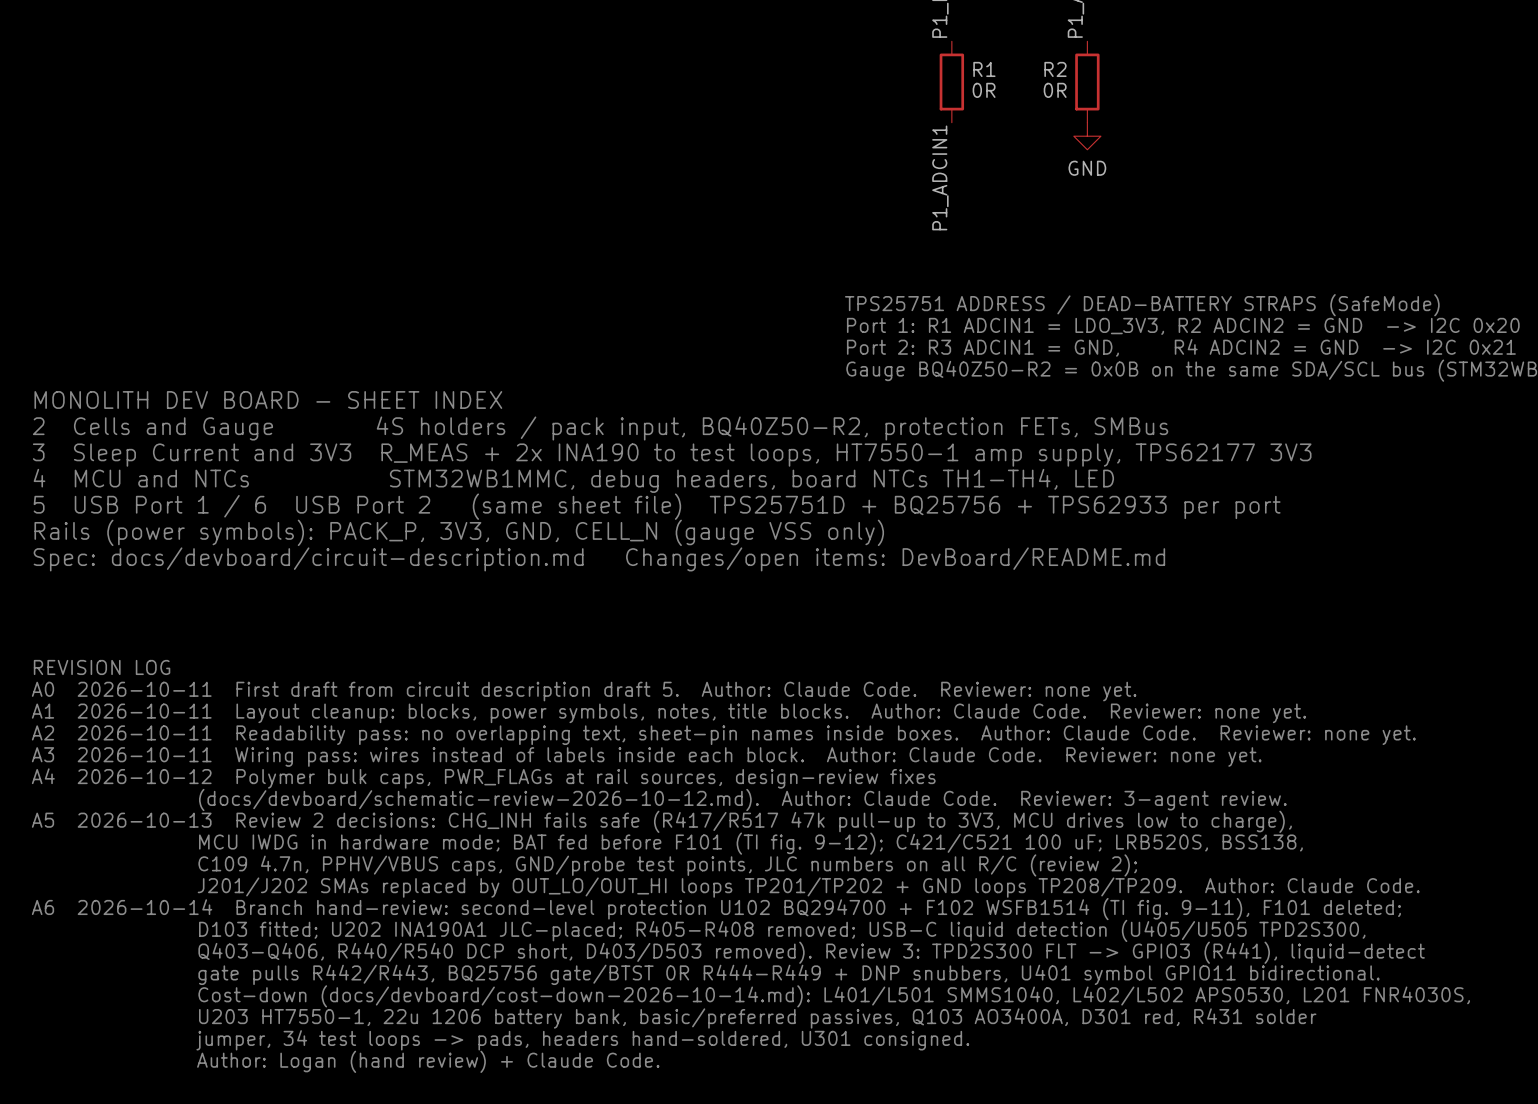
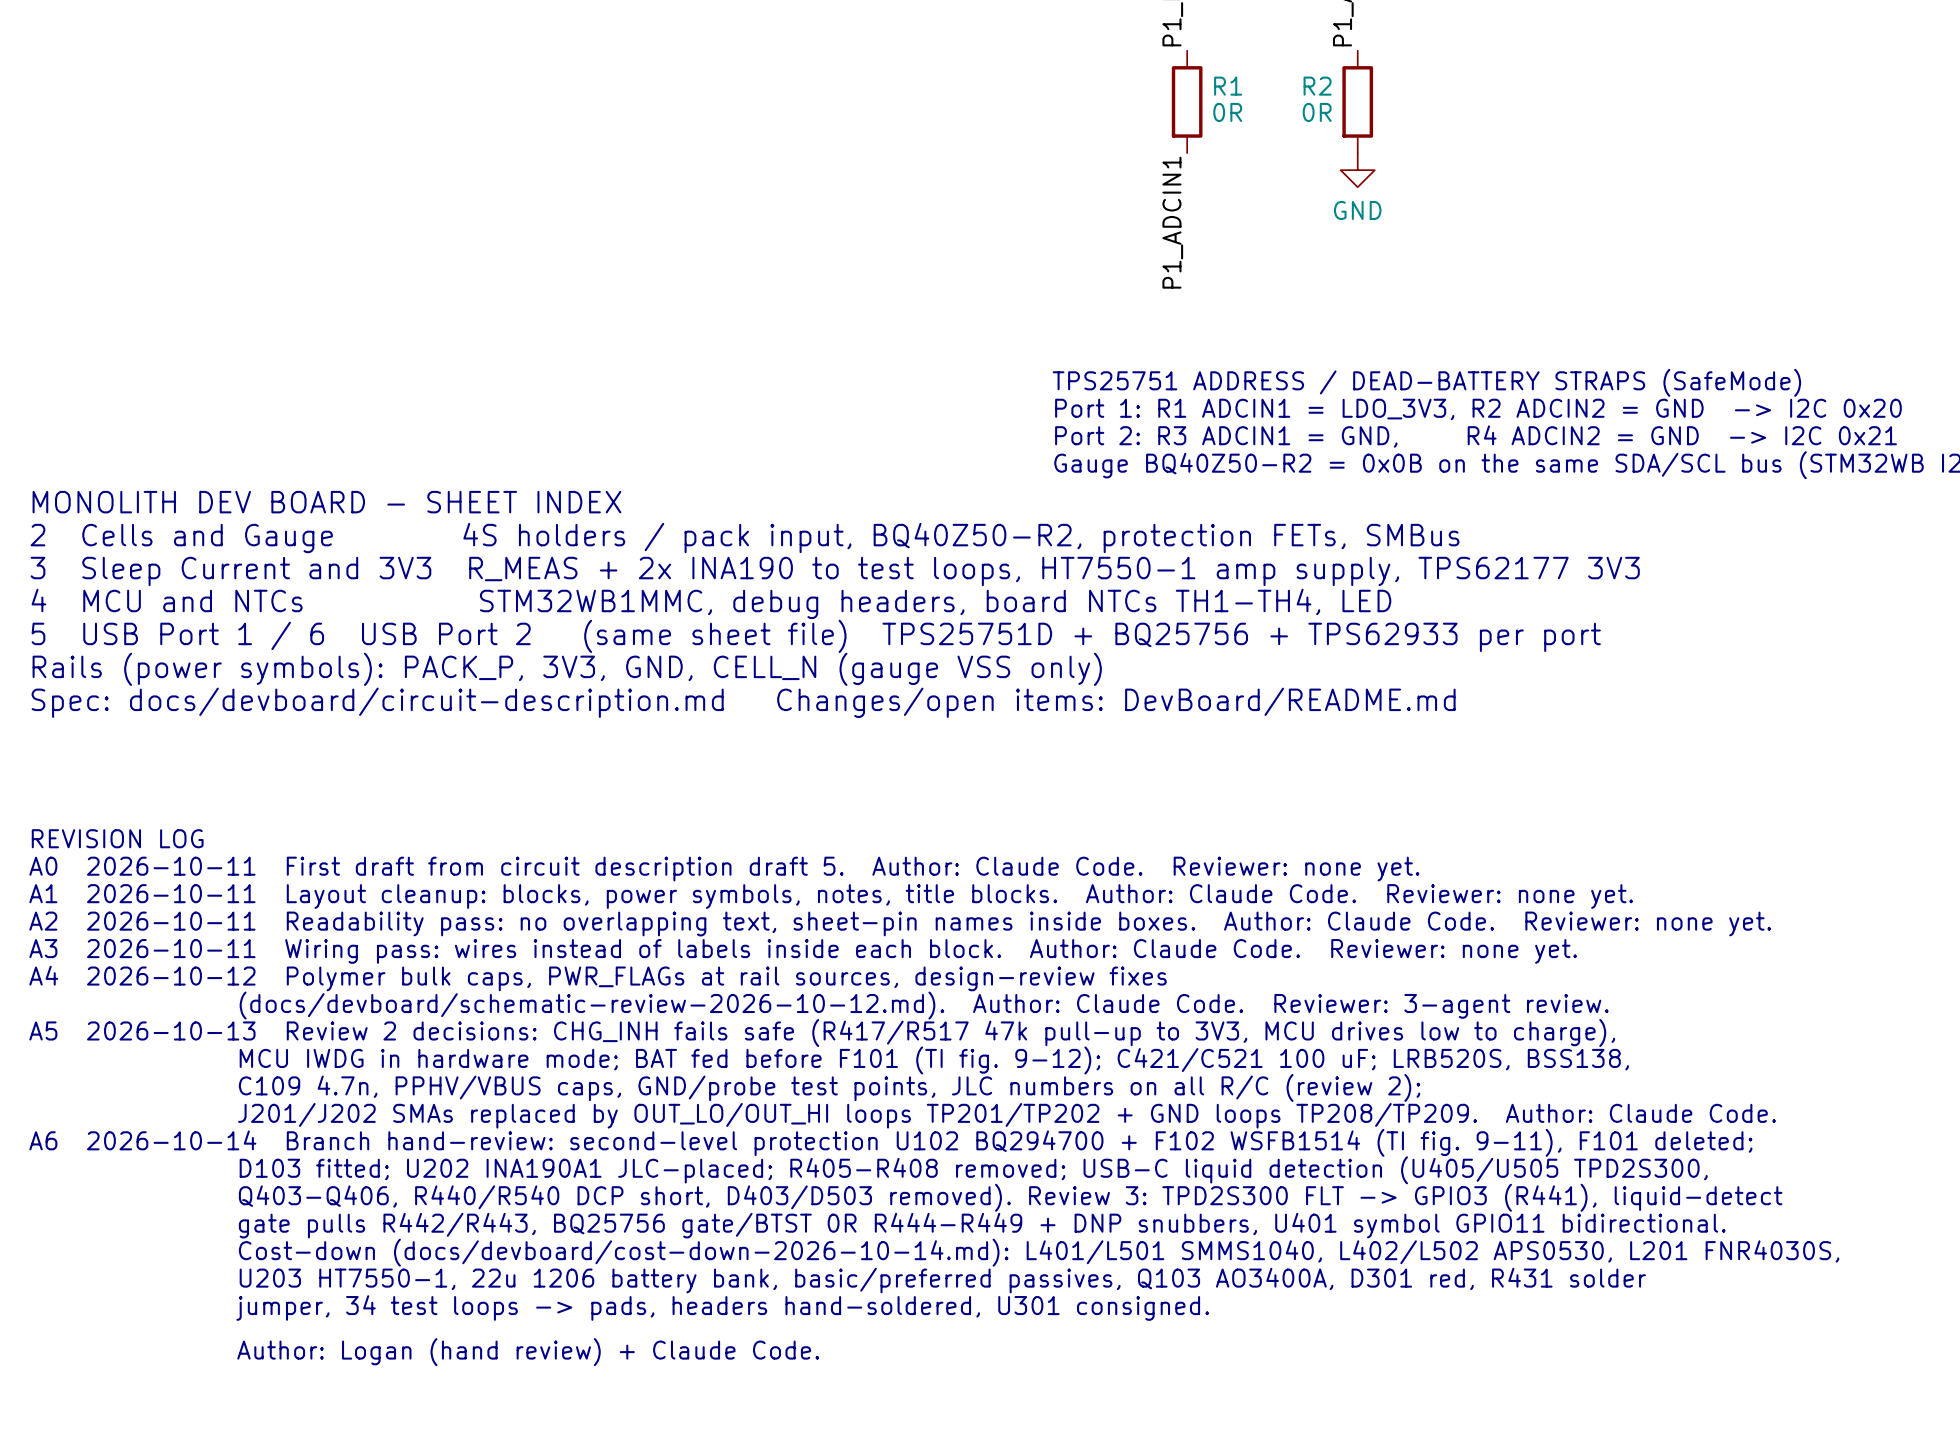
text position: Author: Logan (hand review) + Claude Code. (428, 1061) -> Author: Logan (hand review) + Claude Code. (528, 1352)

